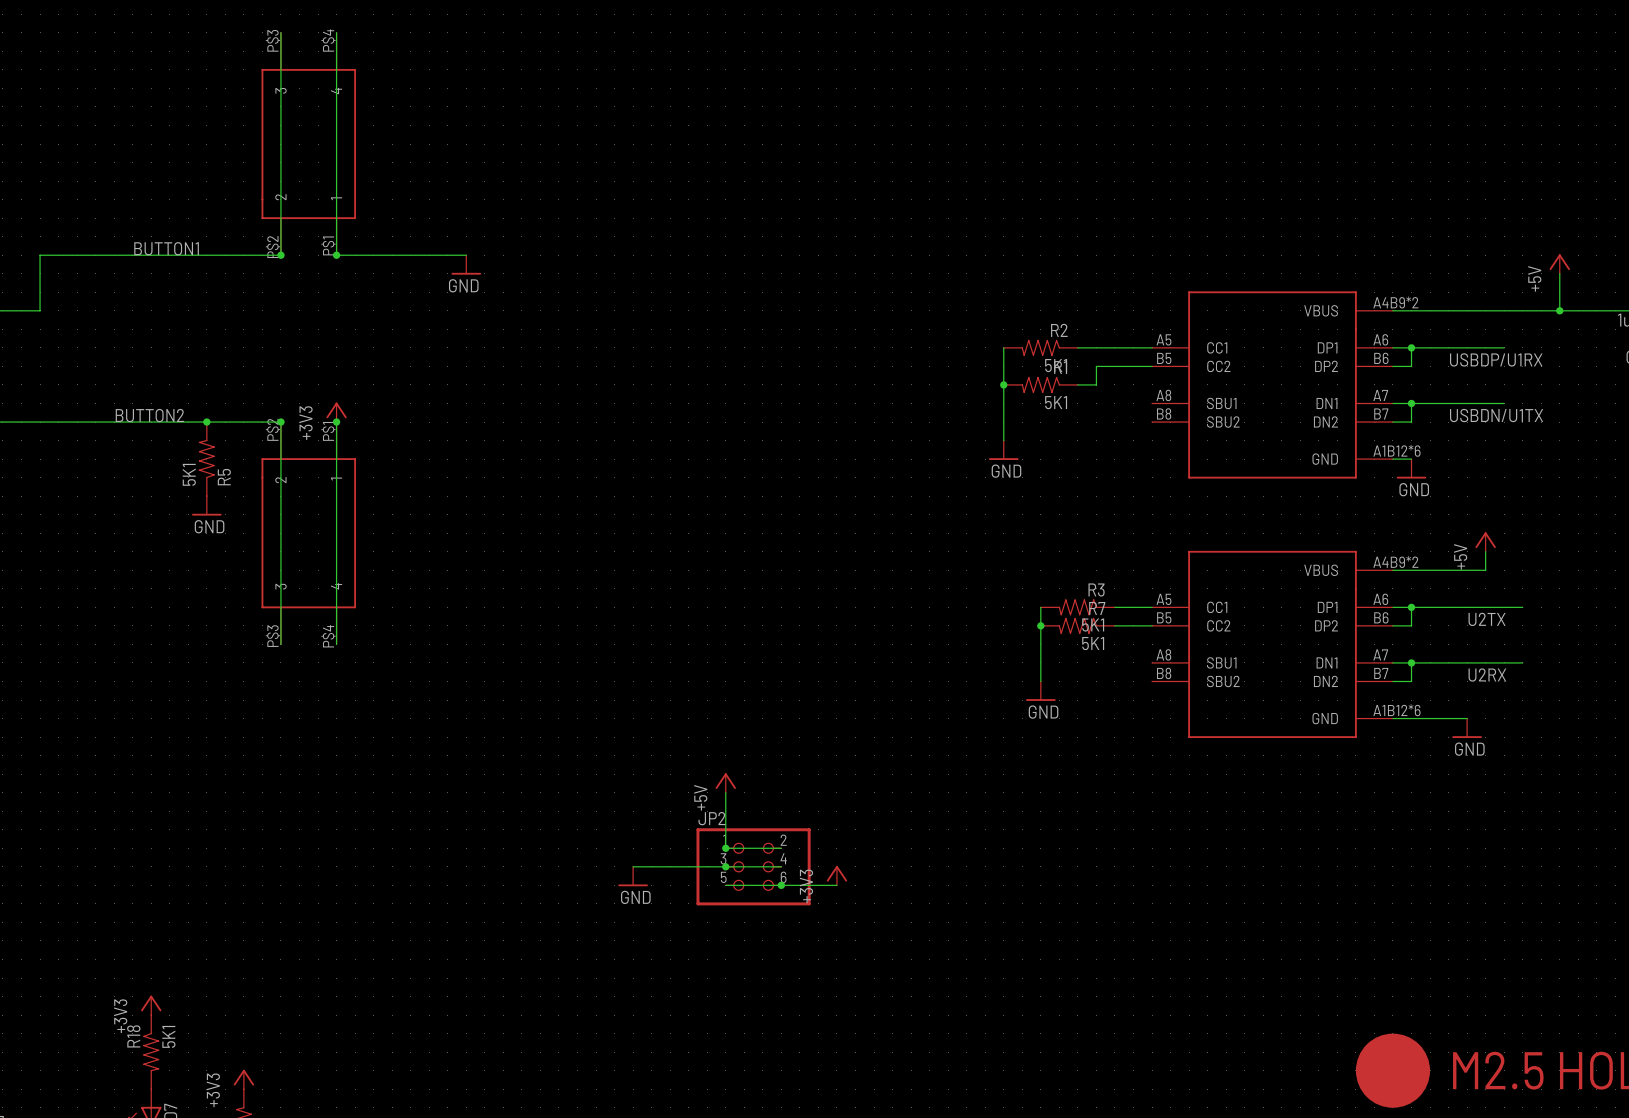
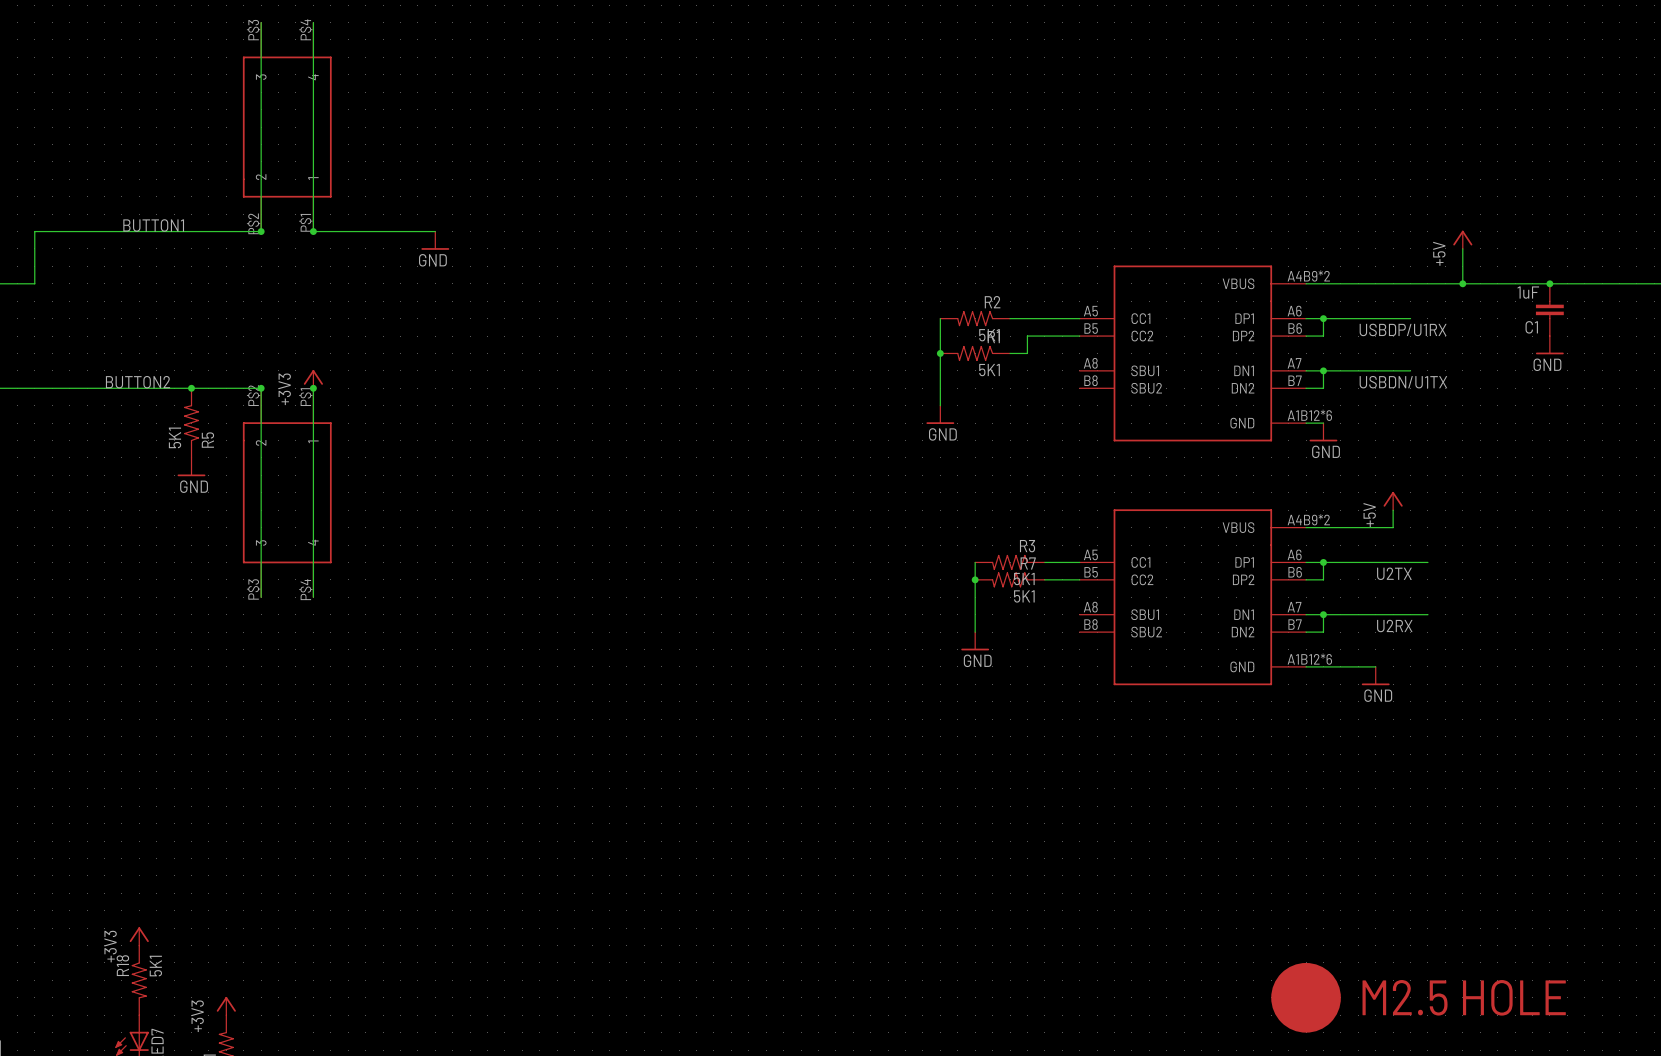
power symbol: +5V (725, 782) -> none
wire: (725, 792) (725, 848) (781, 848) -> none
junction: (725, 848) -> none
wire: (633, 866) (781, 866) -> none
junction: (725, 866) -> none
JP2: (753, 866) -> none
power symbol: +3V3 (836, 875) -> none
power symbol: GND (633, 876) -> none
wire: (725, 885) (836, 885) -> none
junction: (781, 885) -> none

